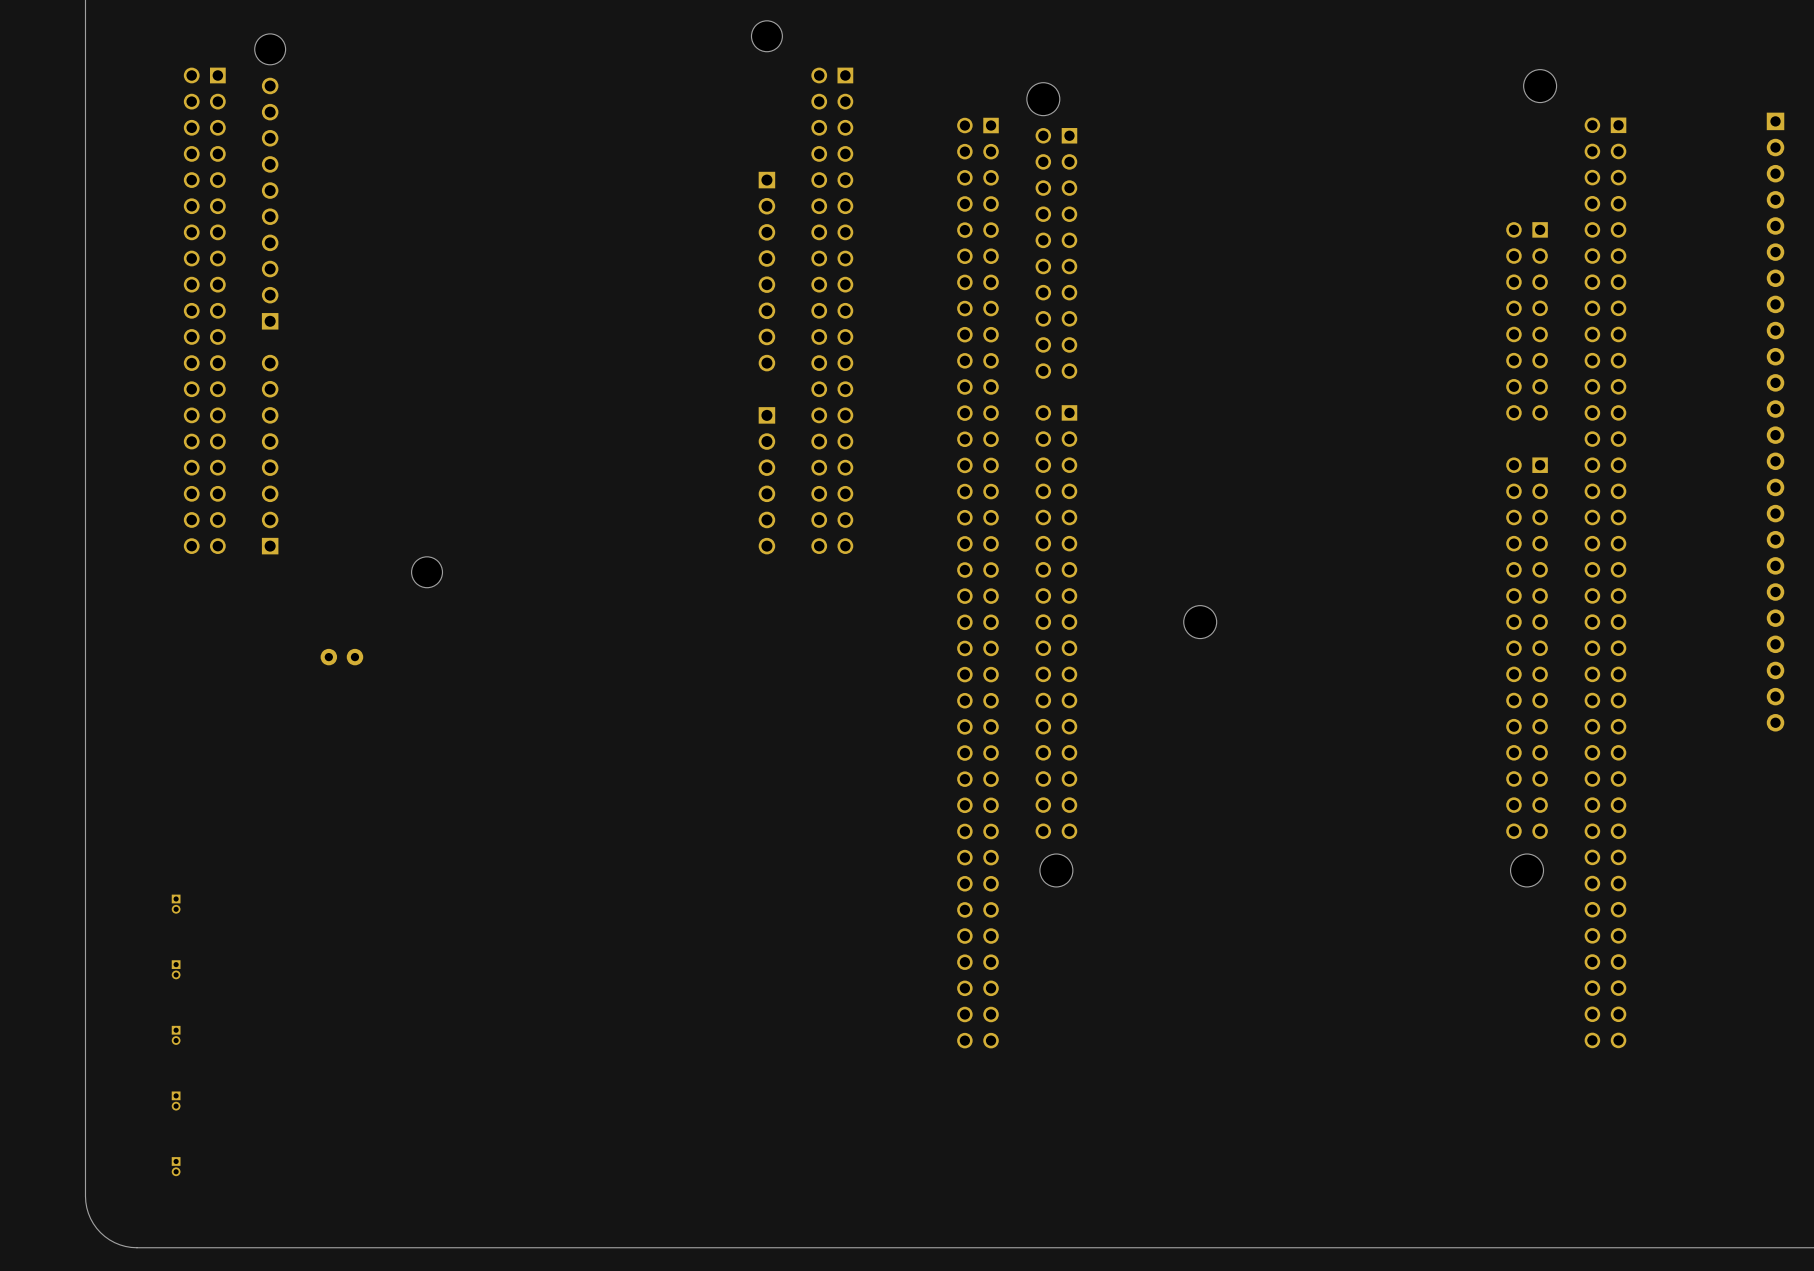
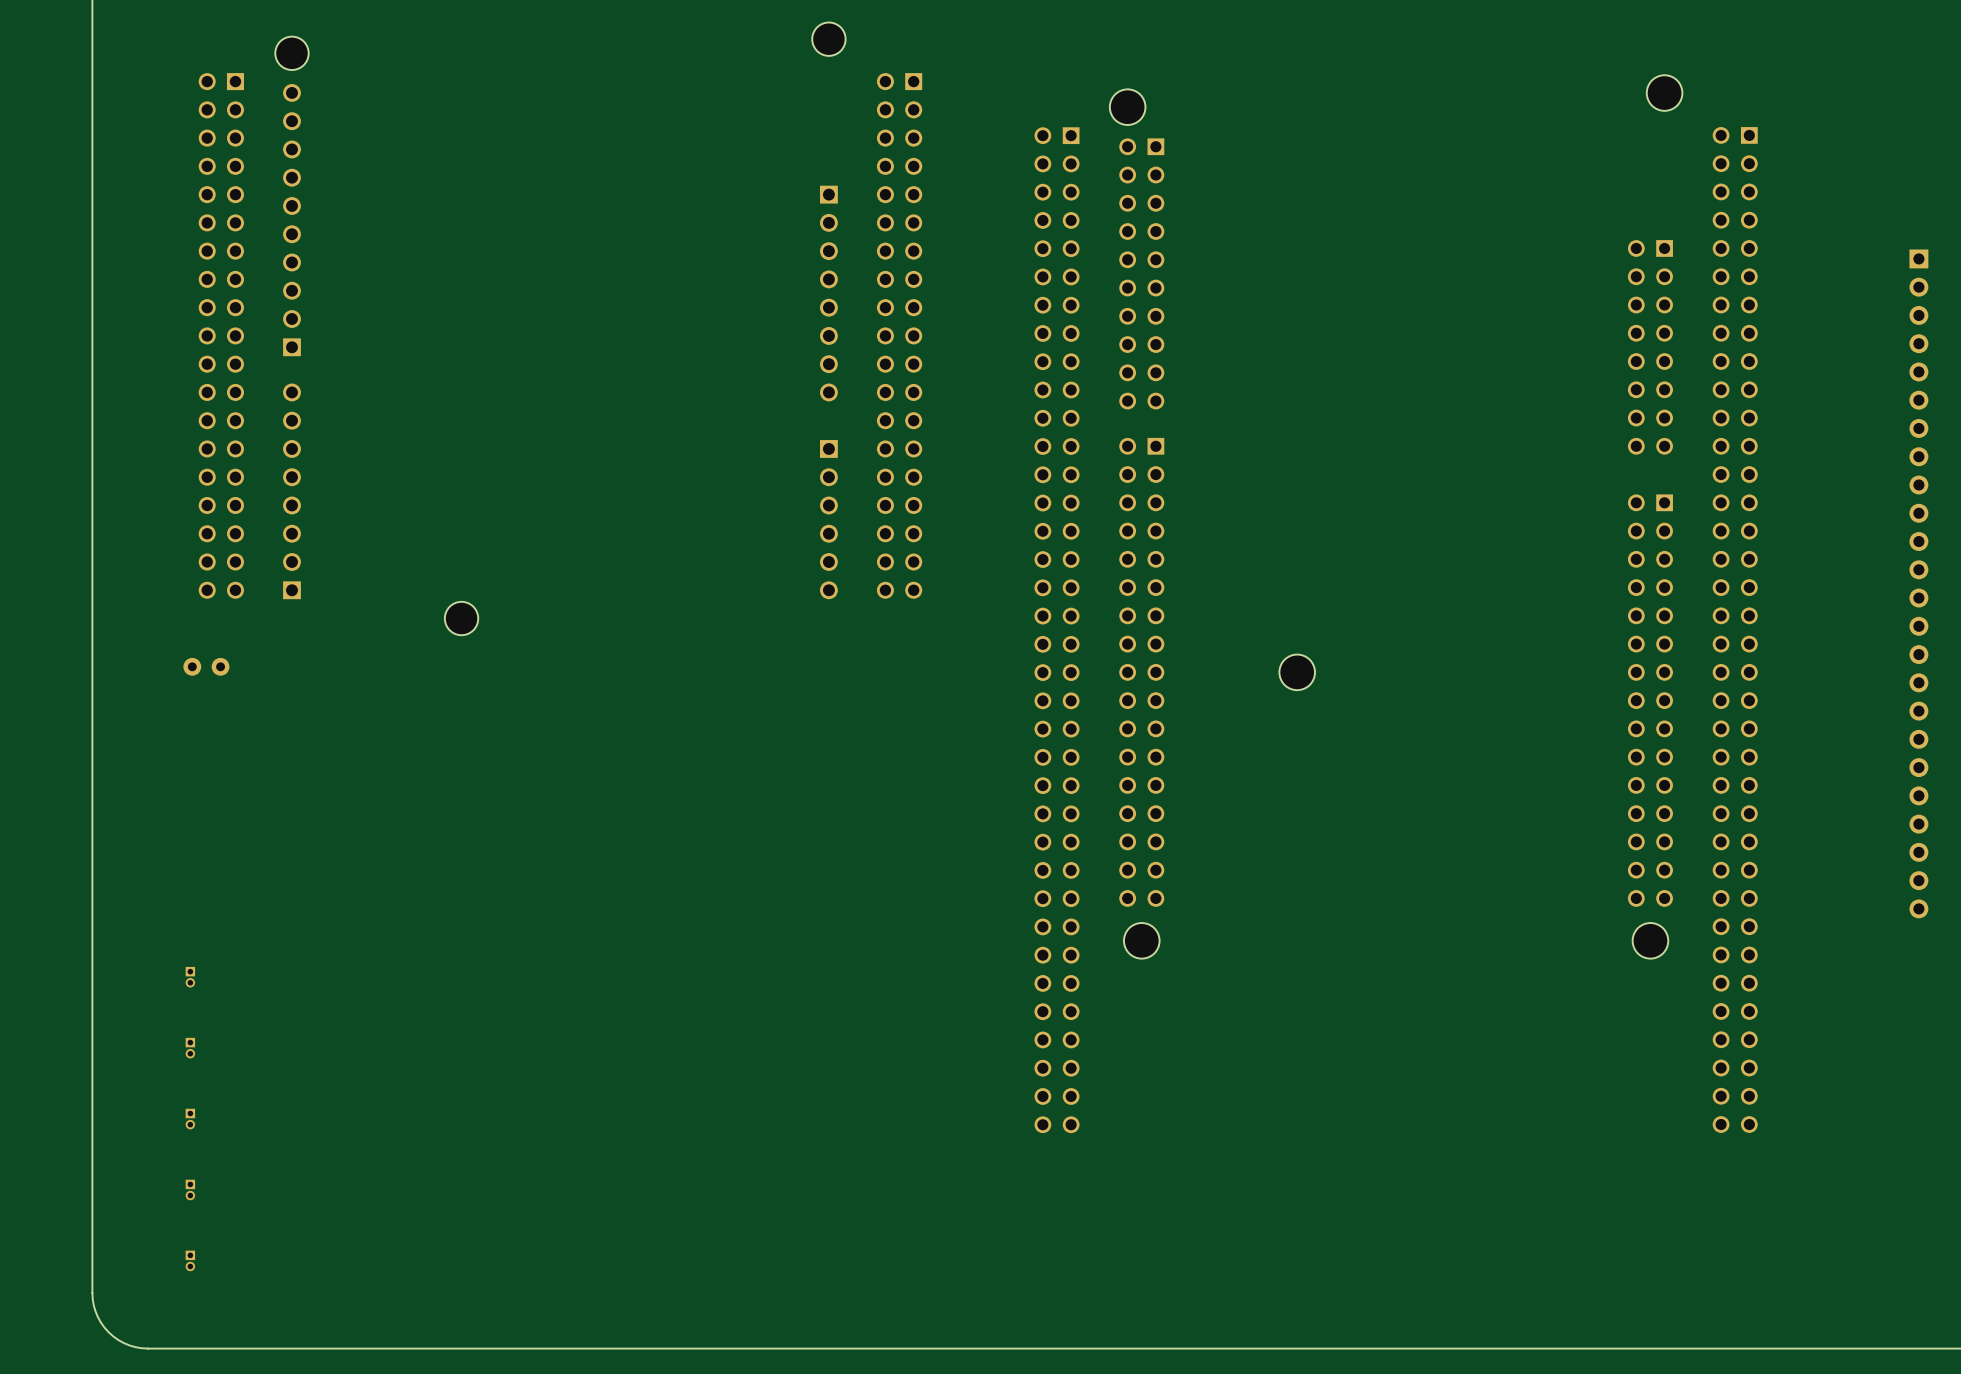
part position: (1775, 422) -> (1918, 583)
part position: (341, 657) -> (206, 666)

